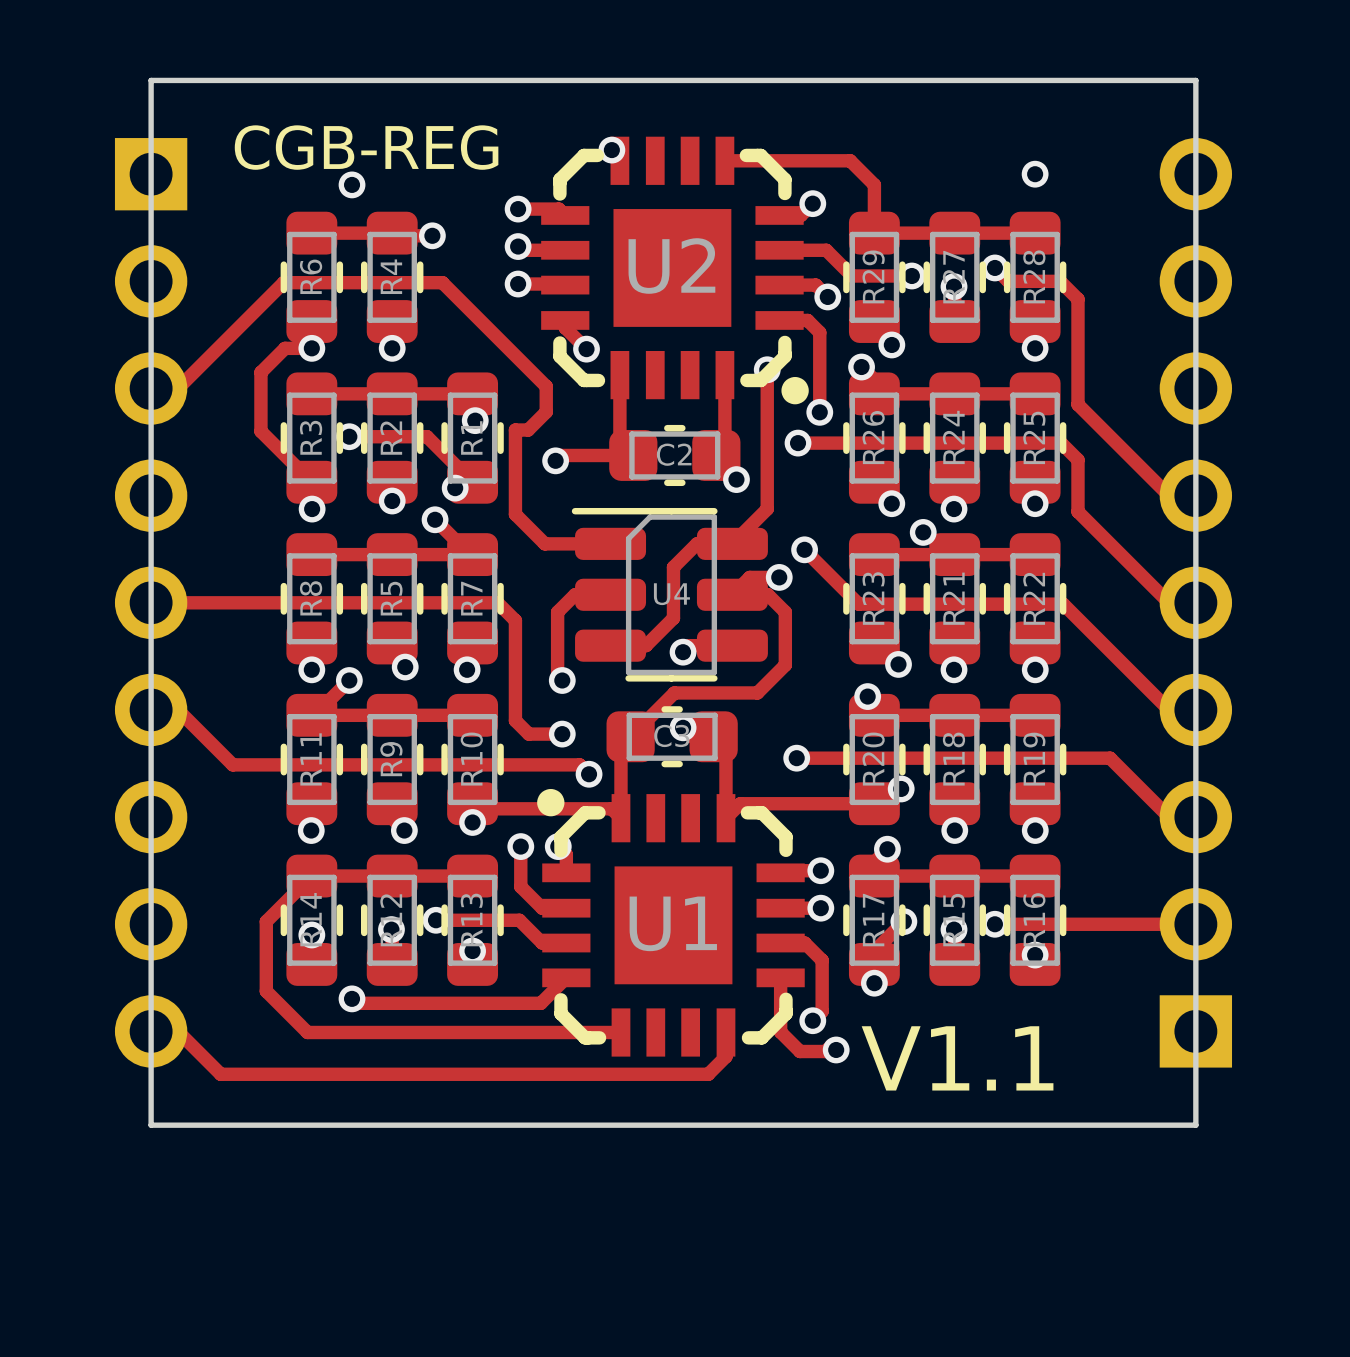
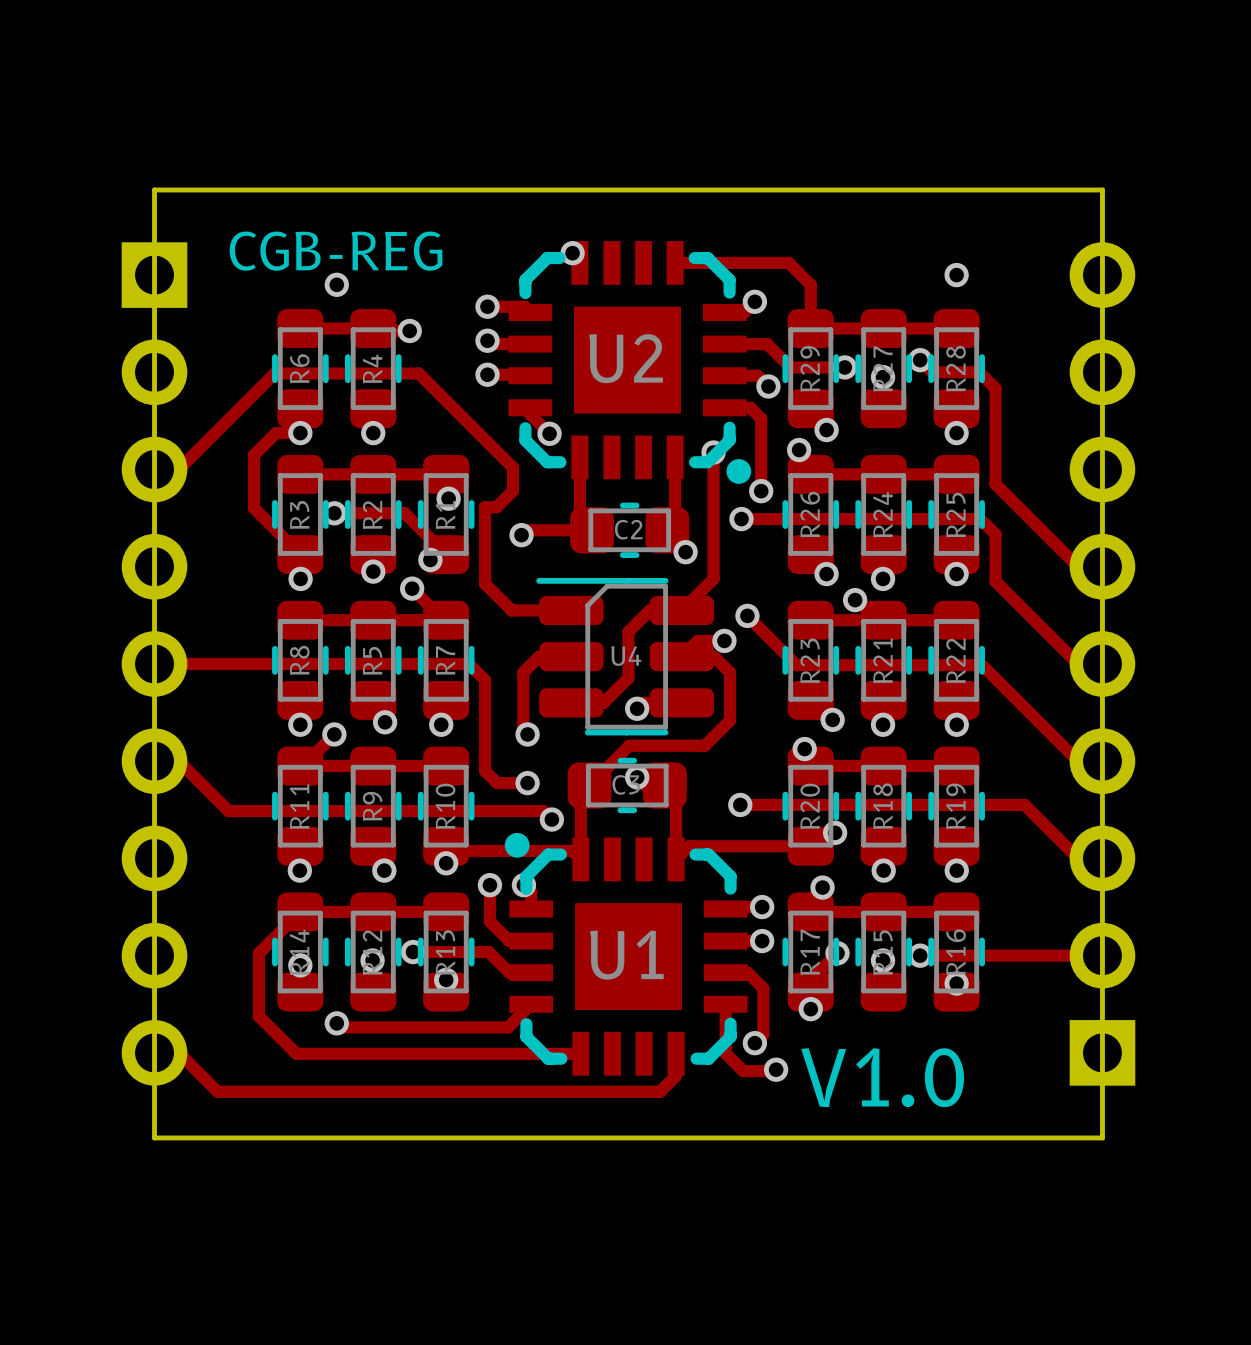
text: V1.1 (957, 1058) -> V1.0 (882, 1077)

